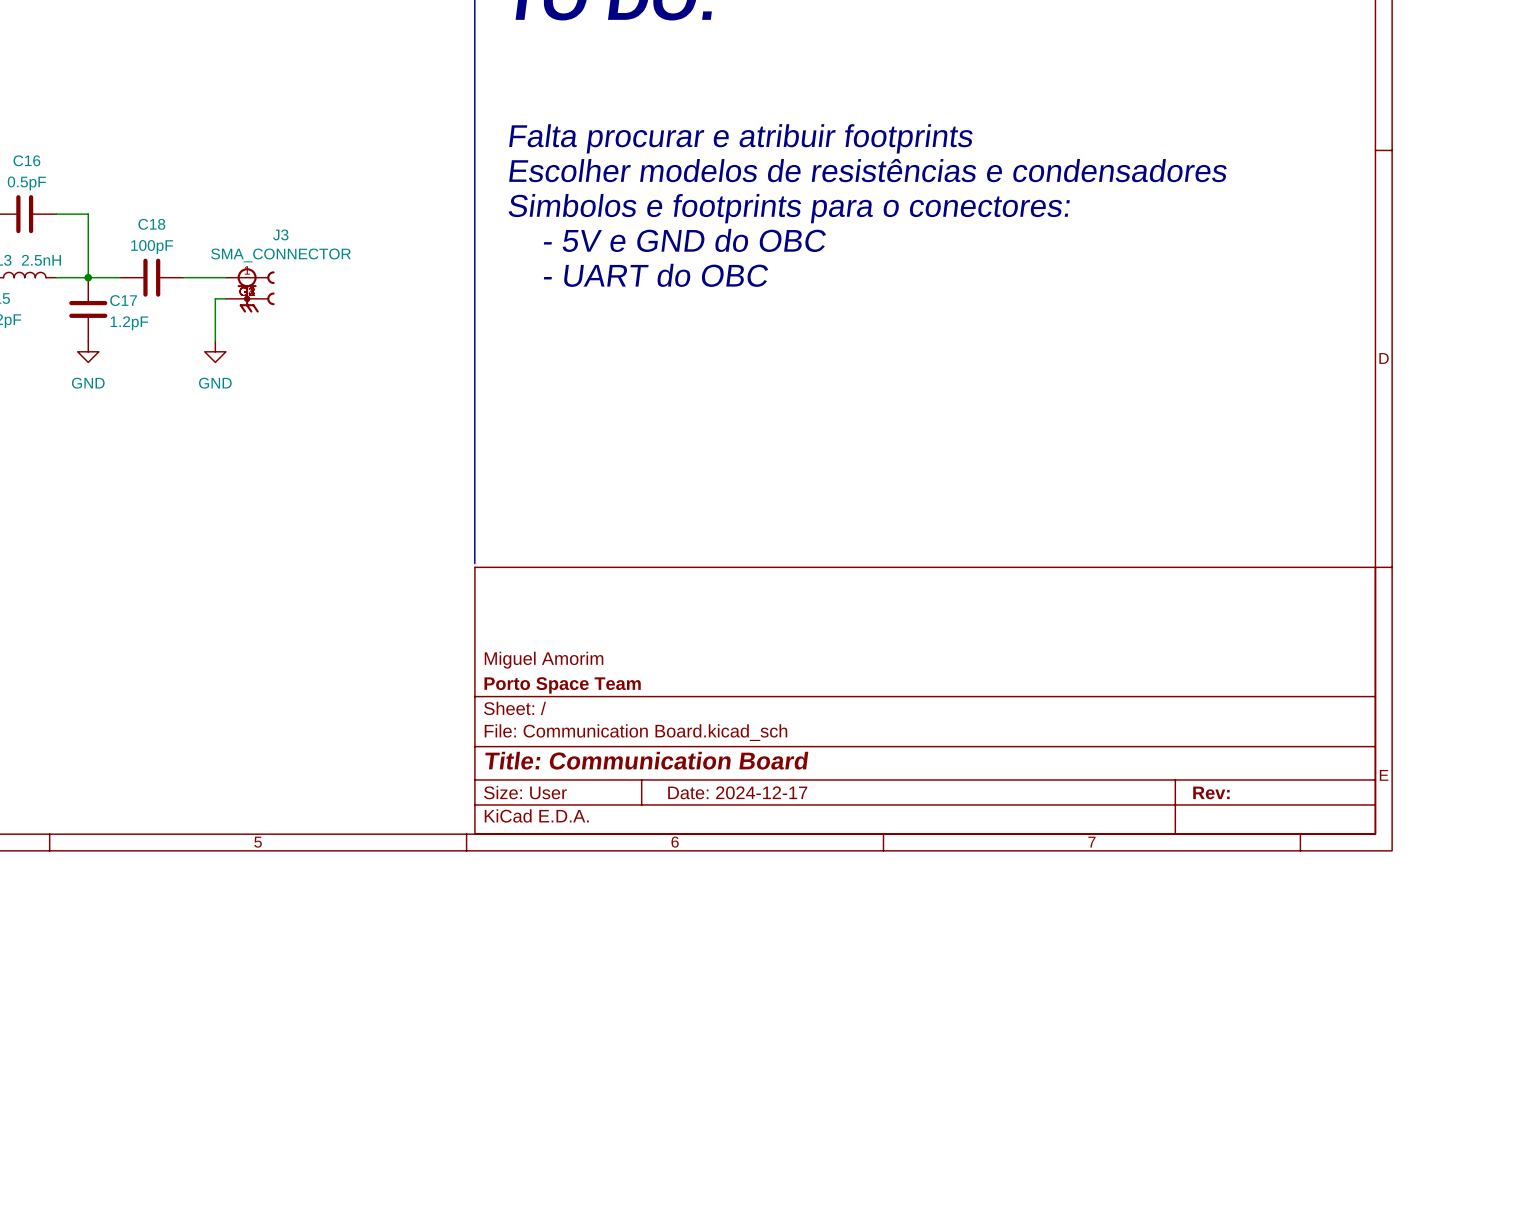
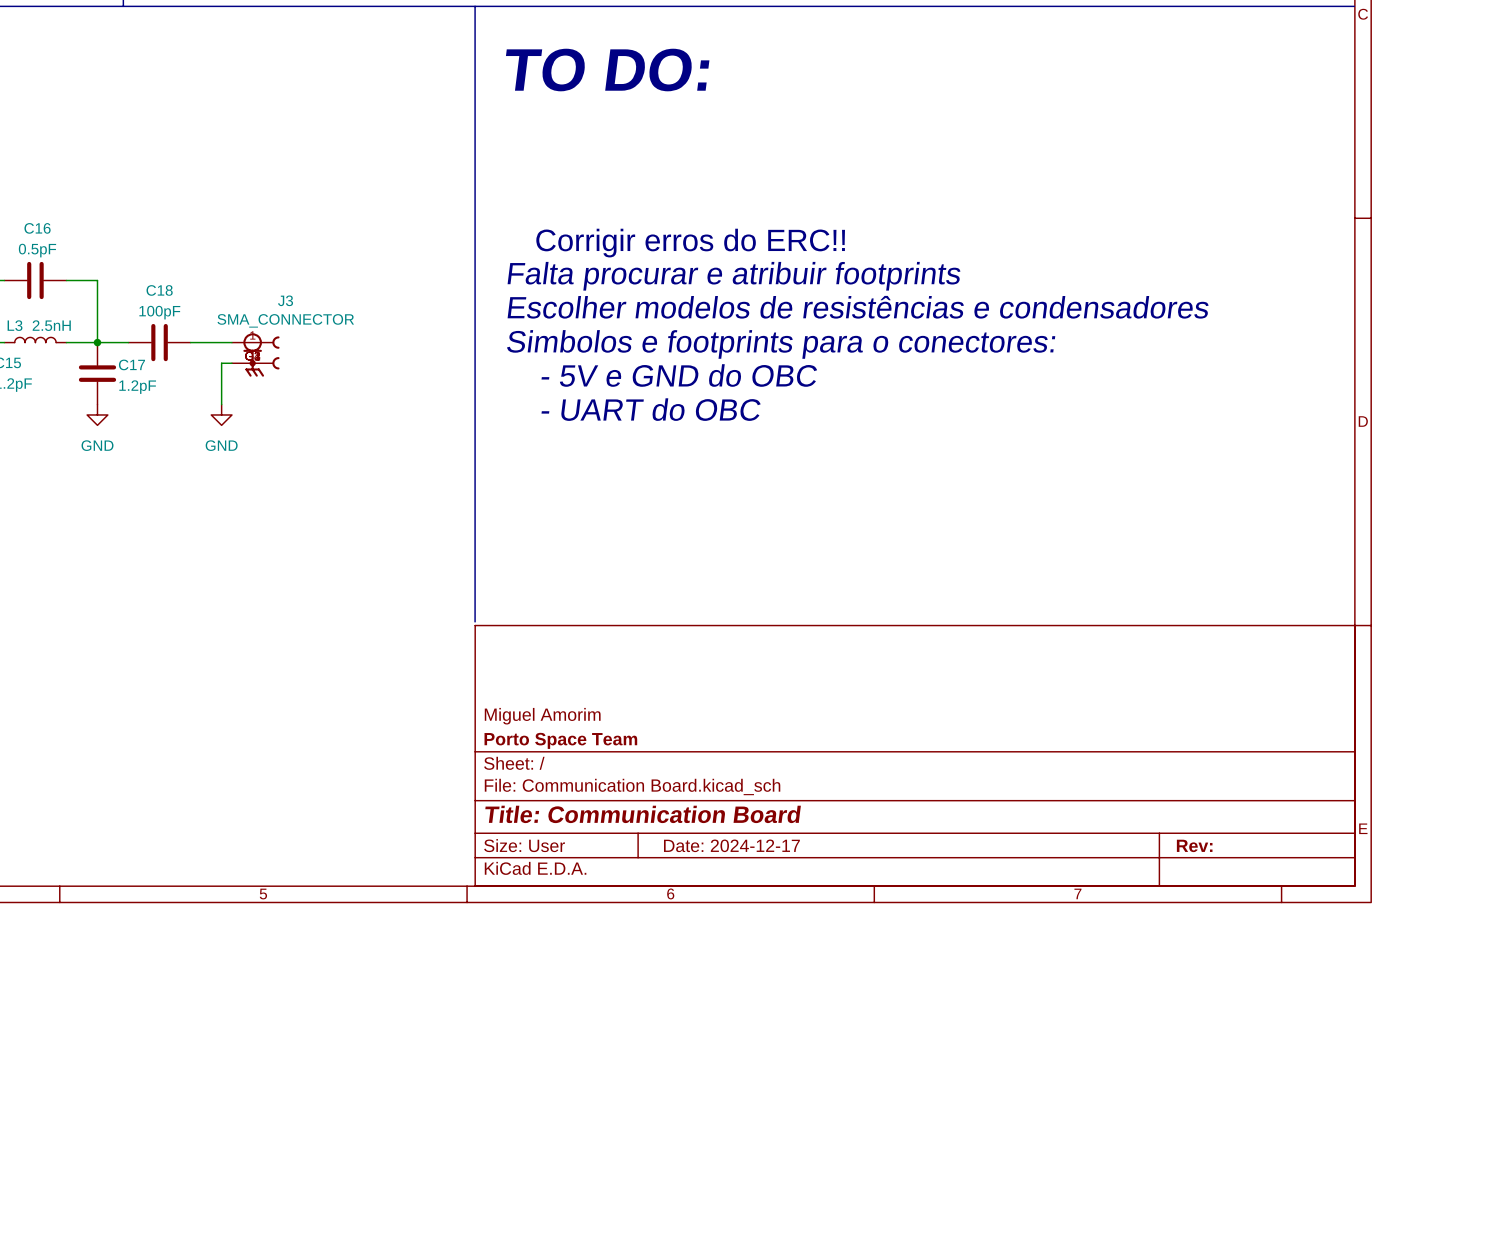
text: Falta procurar e atribuir footprints (740, 138) -> none
text: Escolher modelos de resistências e condensadores (867, 170) -> none
text: none -> Corrigir erros do ERC!! (690, 243)
text: Simbolos e footprints para o conectores: (789, 208) -> Falta procurar e atribuir footprints (733, 276)
text: - 5V e GND do OBC (684, 240) -> Escolher modelos de resistências e condensadores (858, 307)
text: - UART do OBC (656, 275) -> Simbolos e footprints para o conectores: (781, 344)
text: none -> - 5V e GND do OBC (679, 375)
text: none -> - UART do OBC (651, 409)

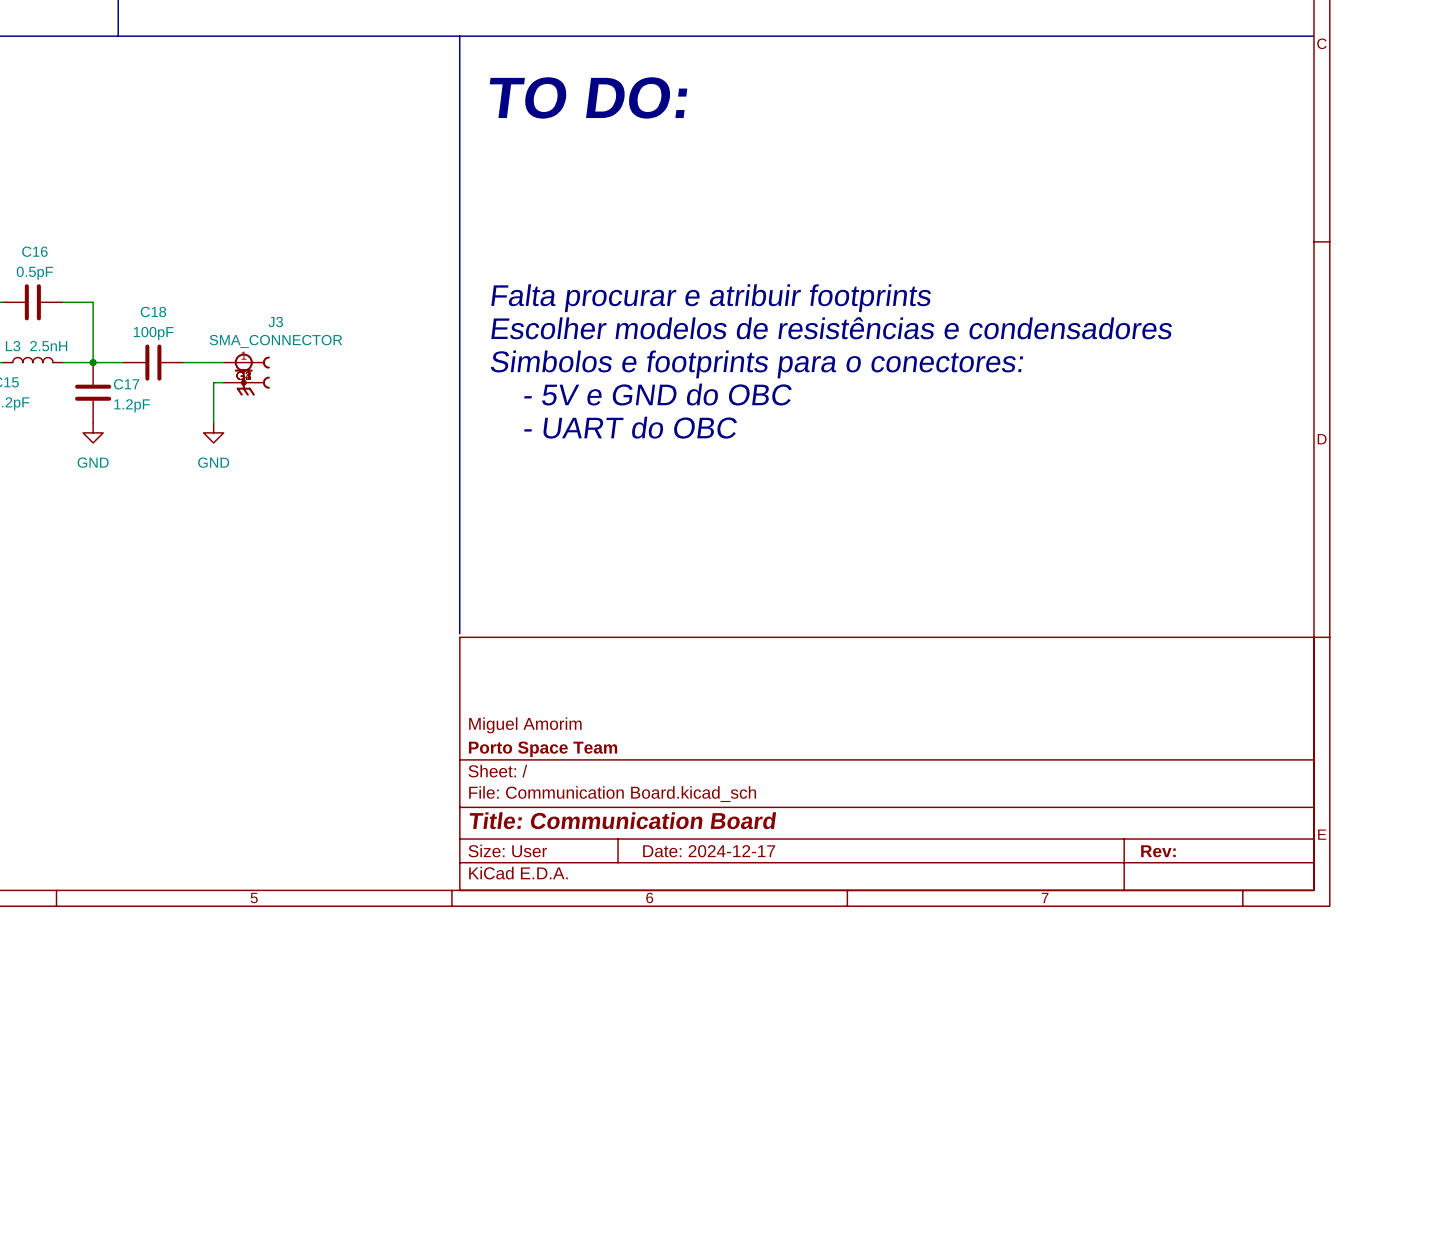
text: Corrigir erros do ERC!! (690, 243) -> none

